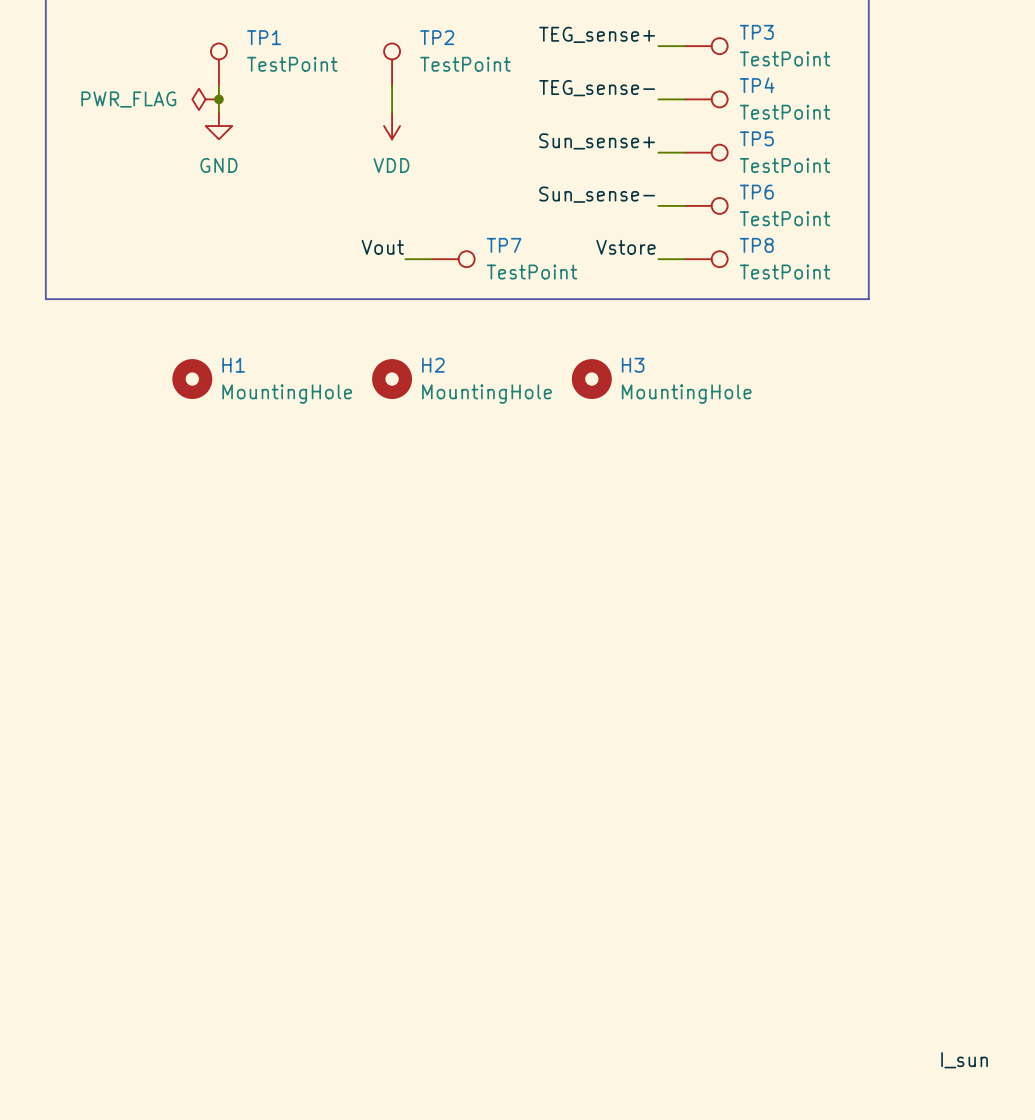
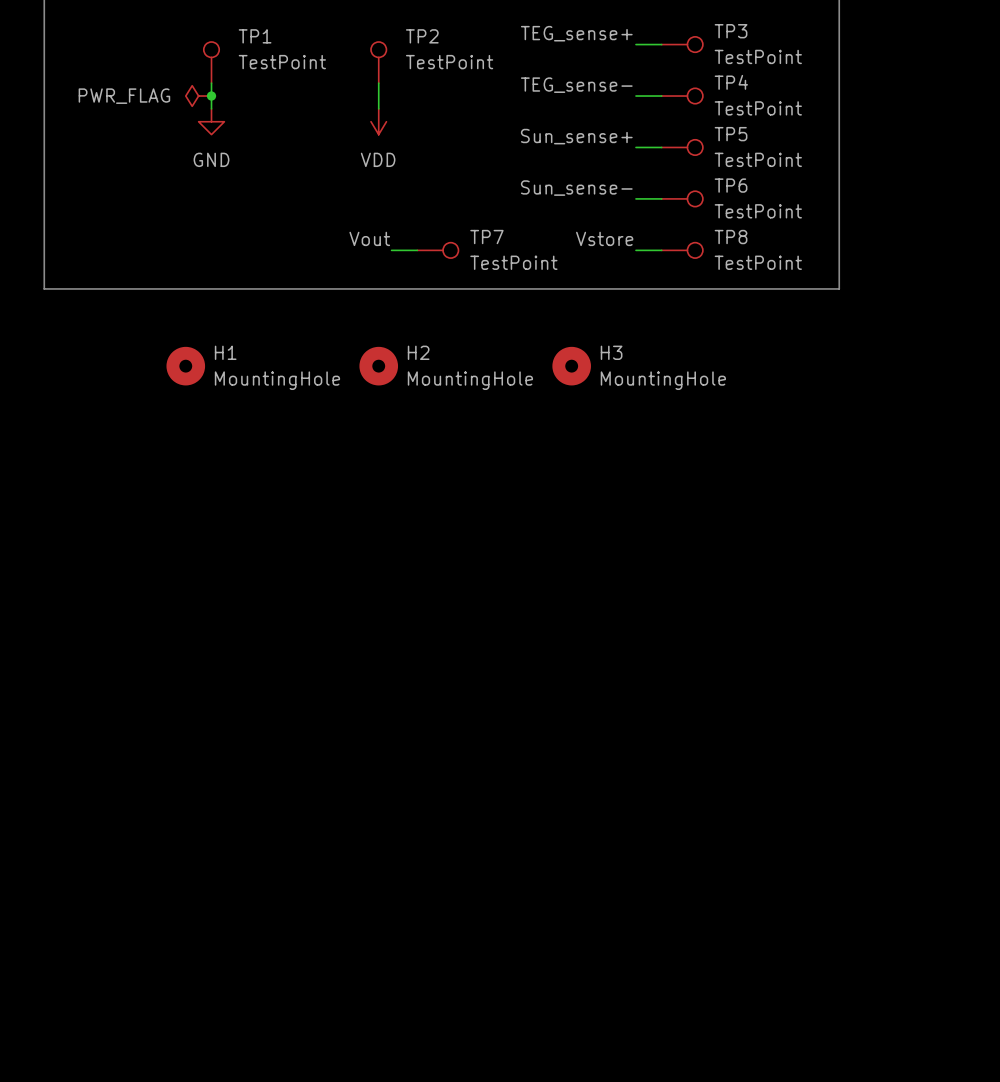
label: I_sun (964, 1060) -> none

